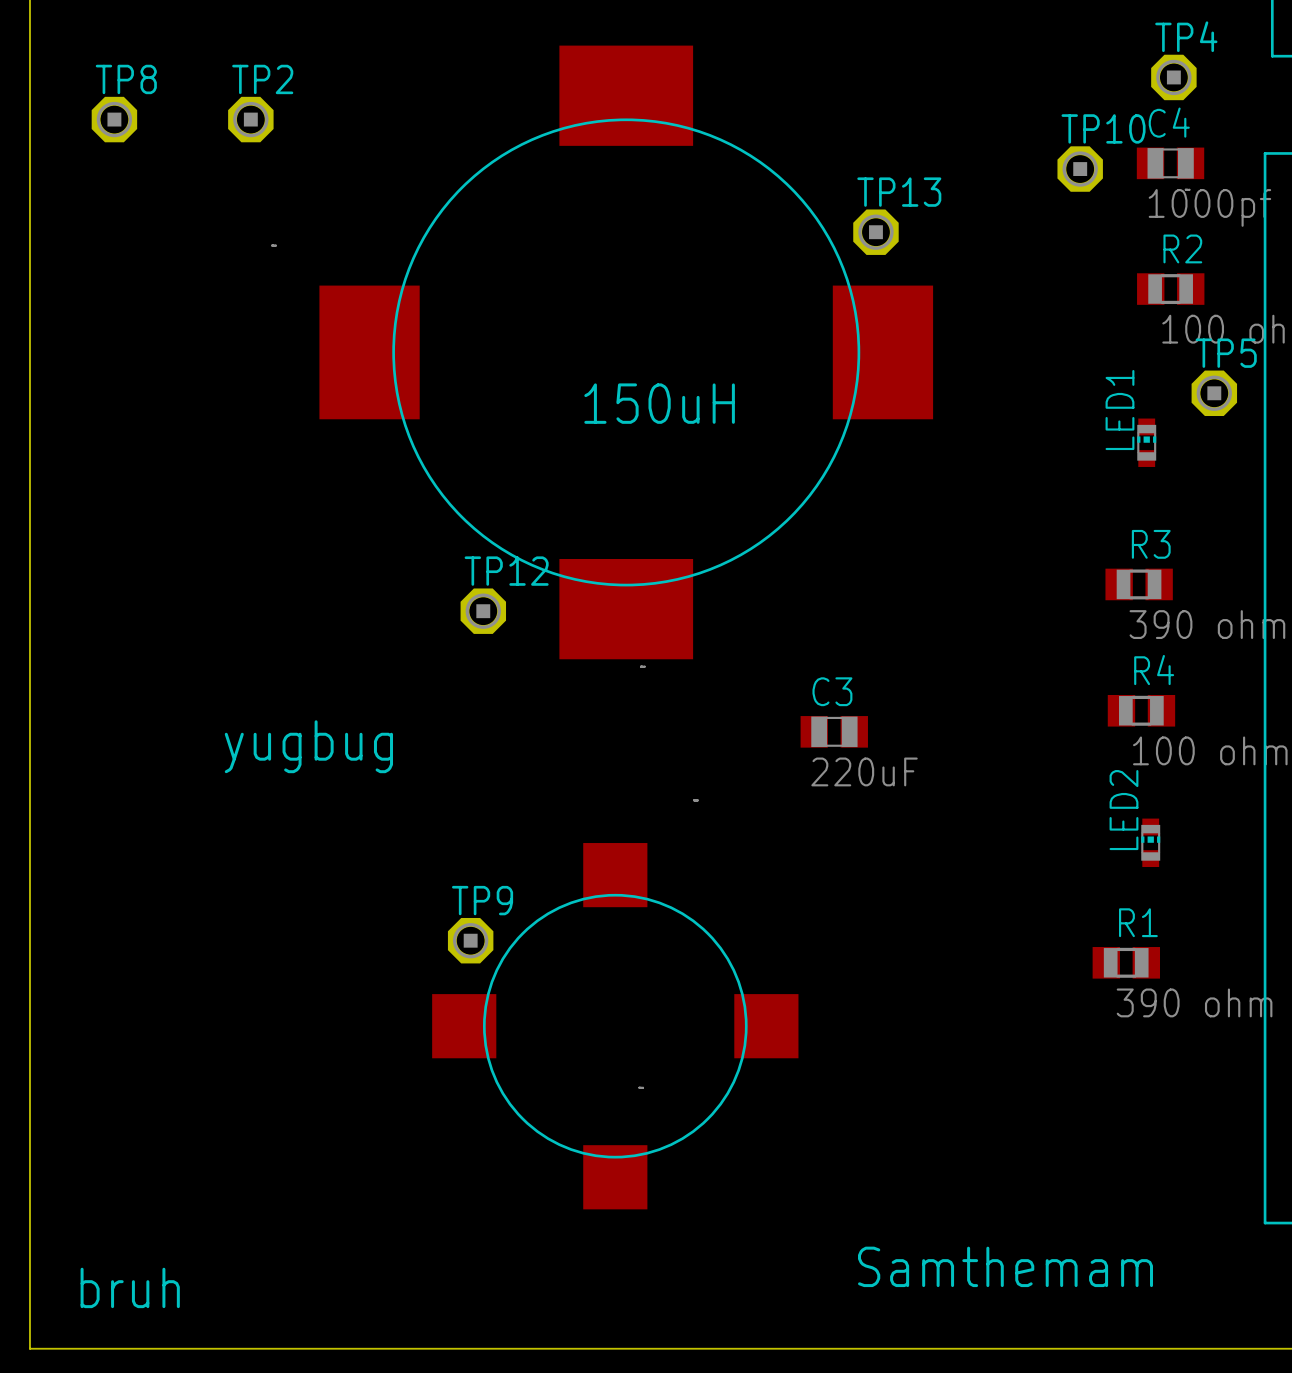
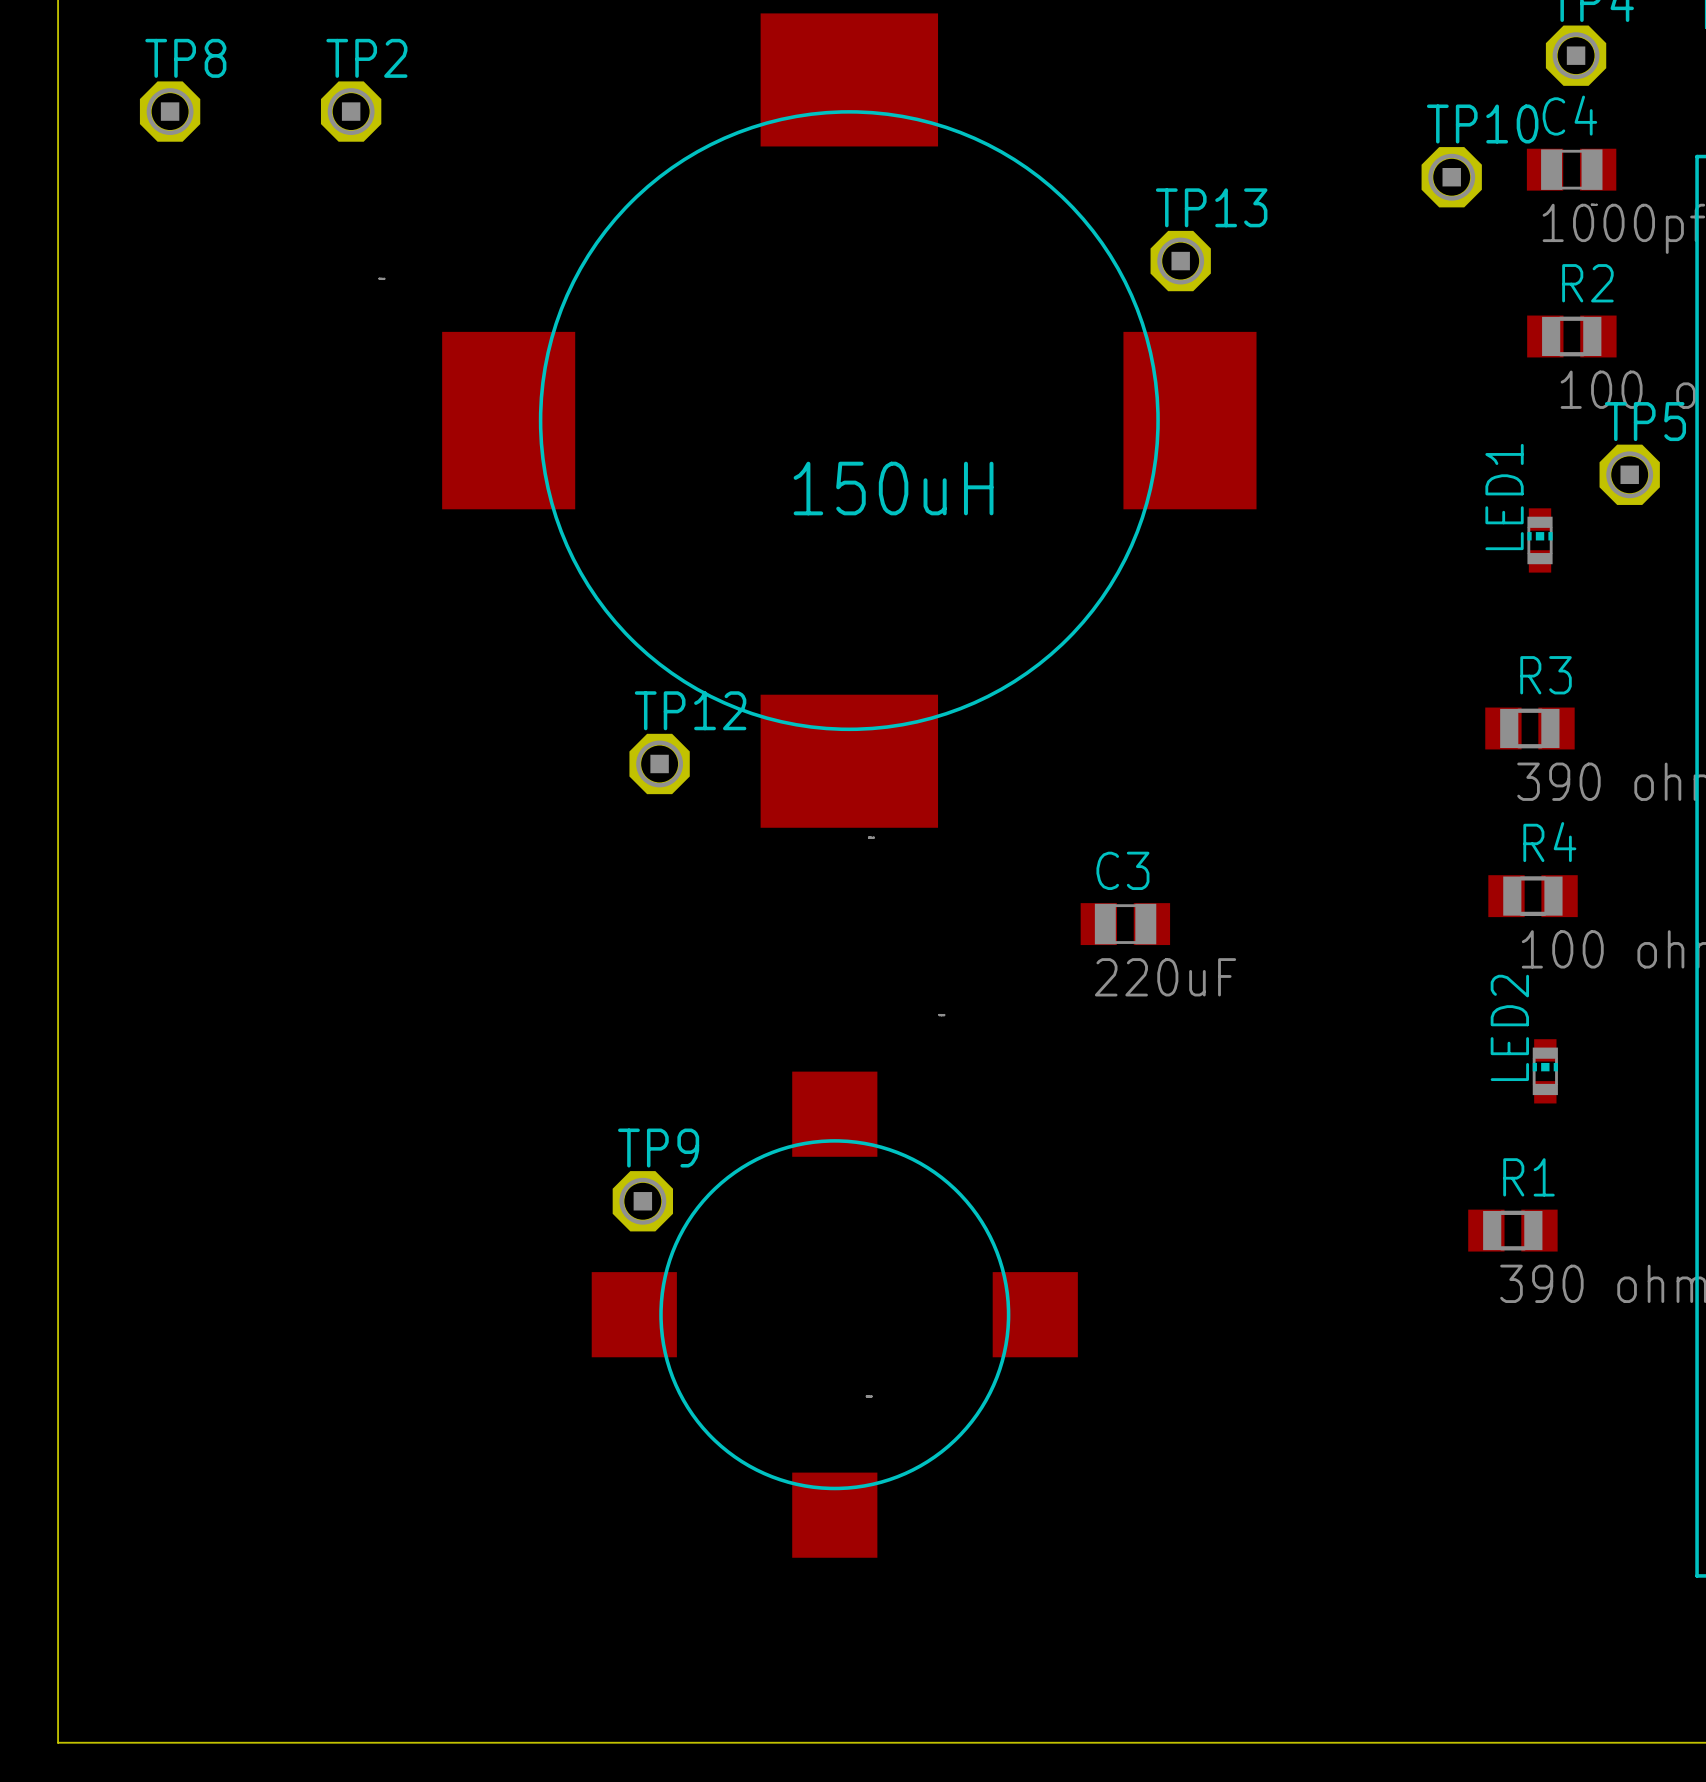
text: yugbug (308, 746) -> none
text: Samthemam (1005, 1266) -> none
text: bruh (130, 1287) -> none

